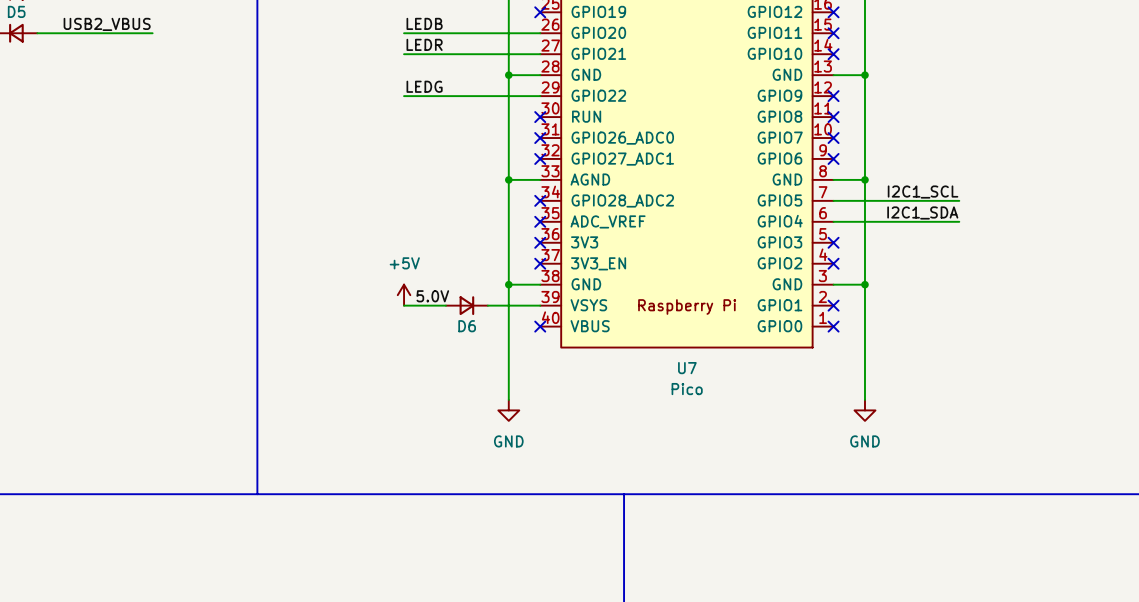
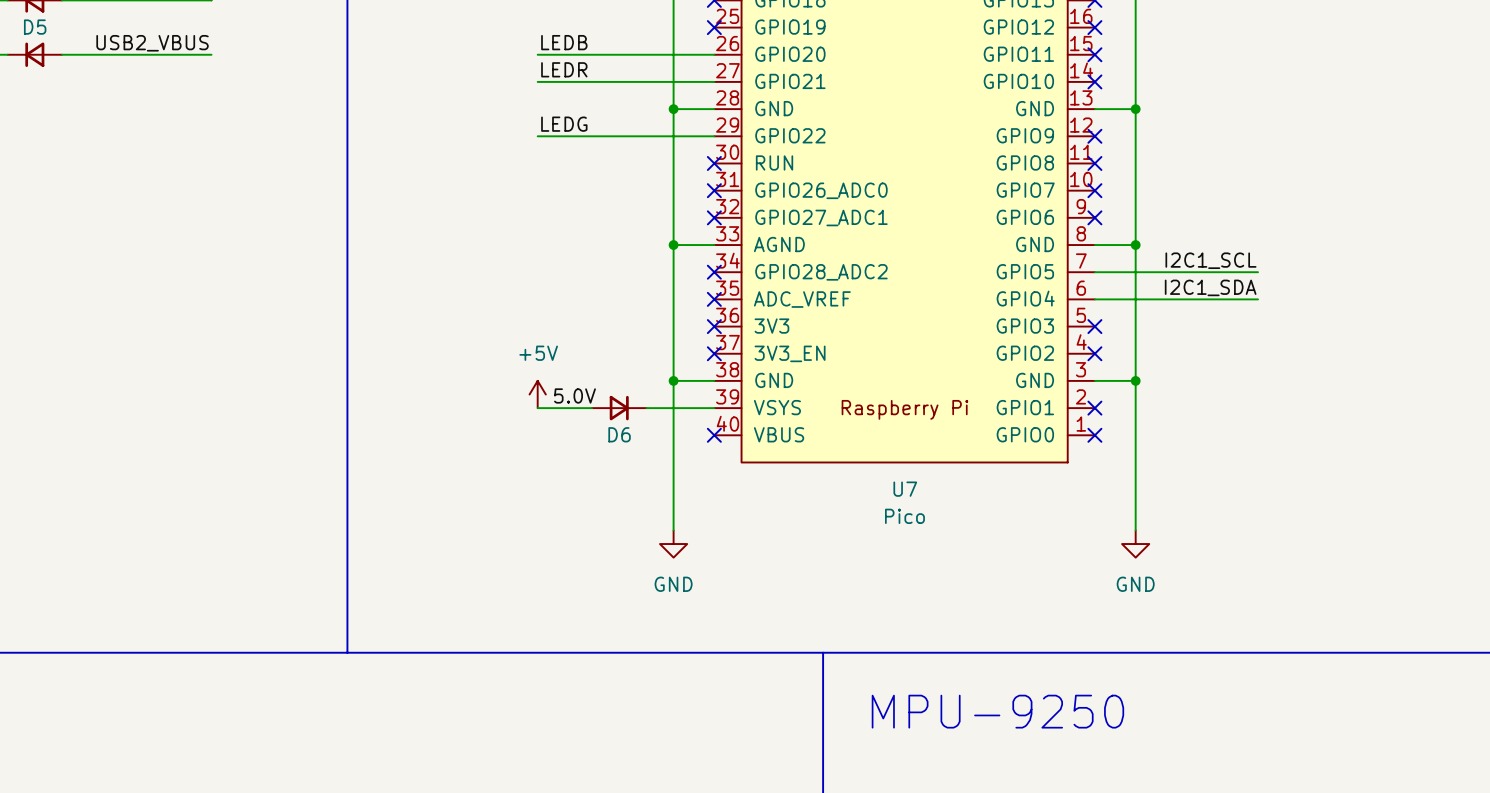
text: none -> MPU-9250 (997, 711)

